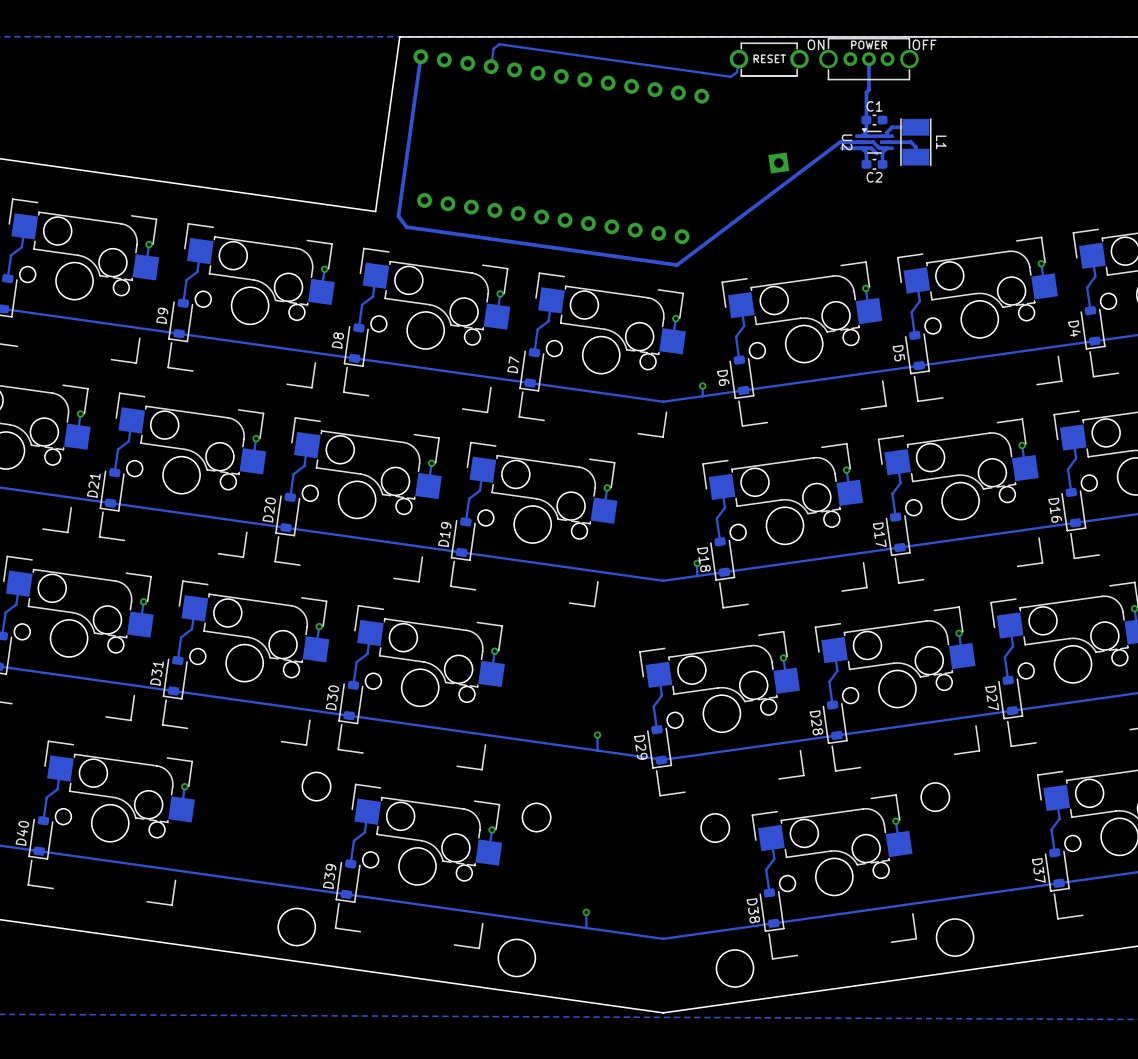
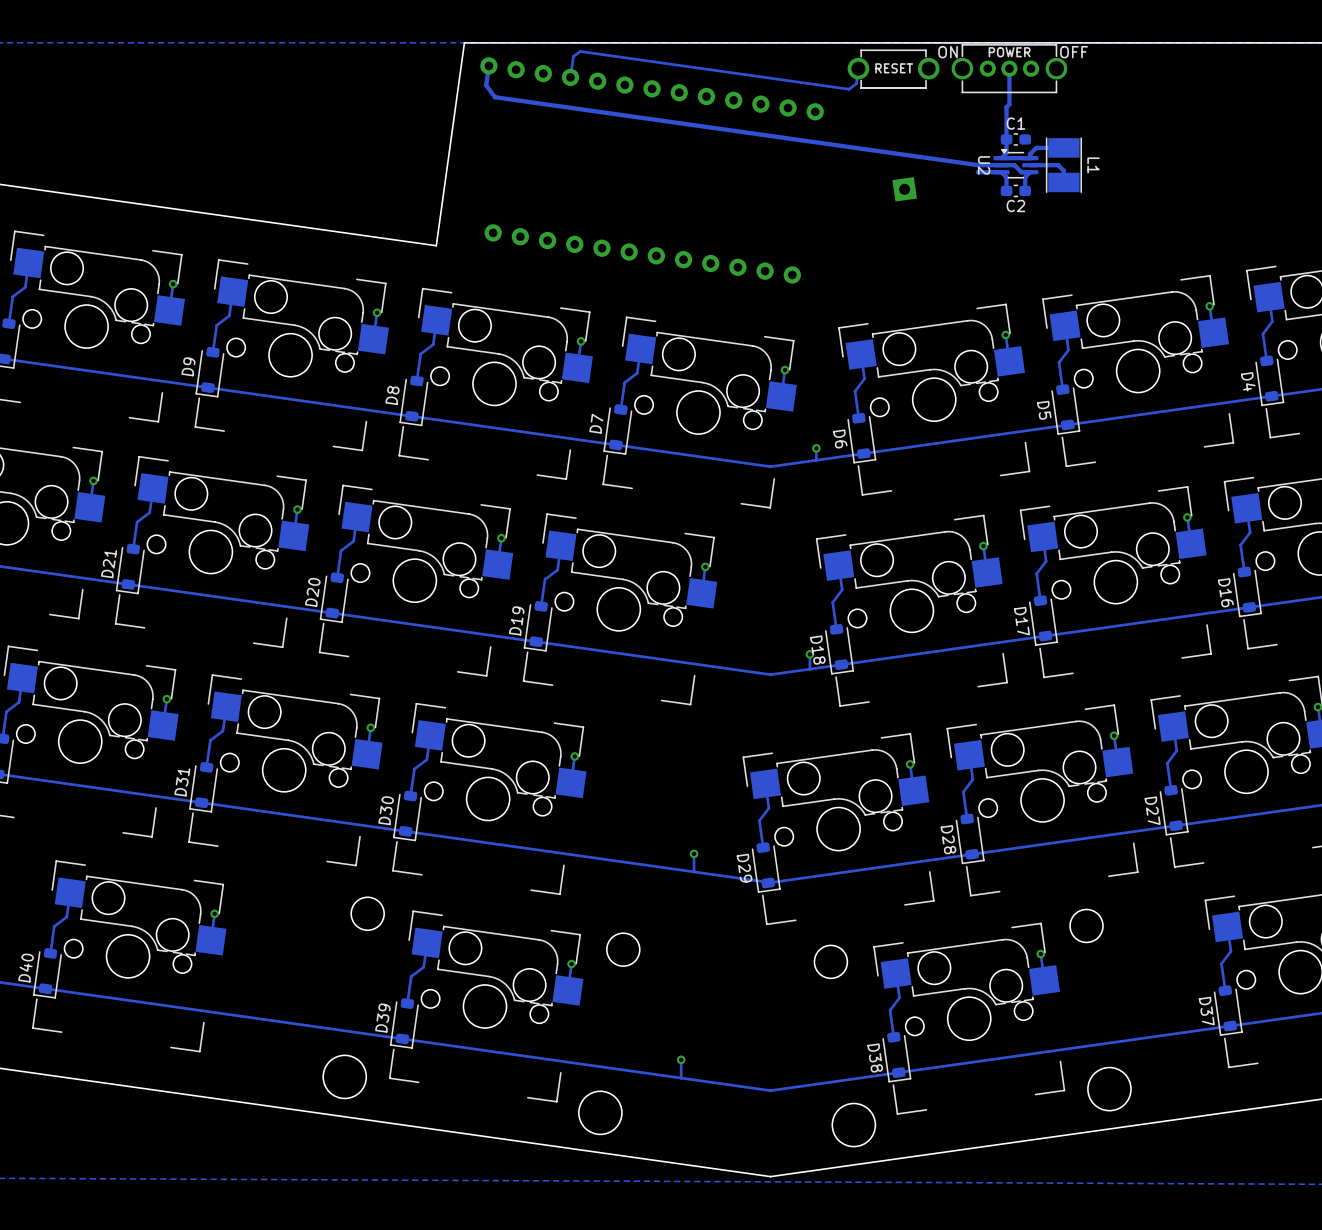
track: (418, 73) (398, 216) (406, 227) (676, 265) (840, 141) -> (486, 85) (495, 97) (976, 164)
track: (862, 148) (871, 148) (876, 153) -> none

